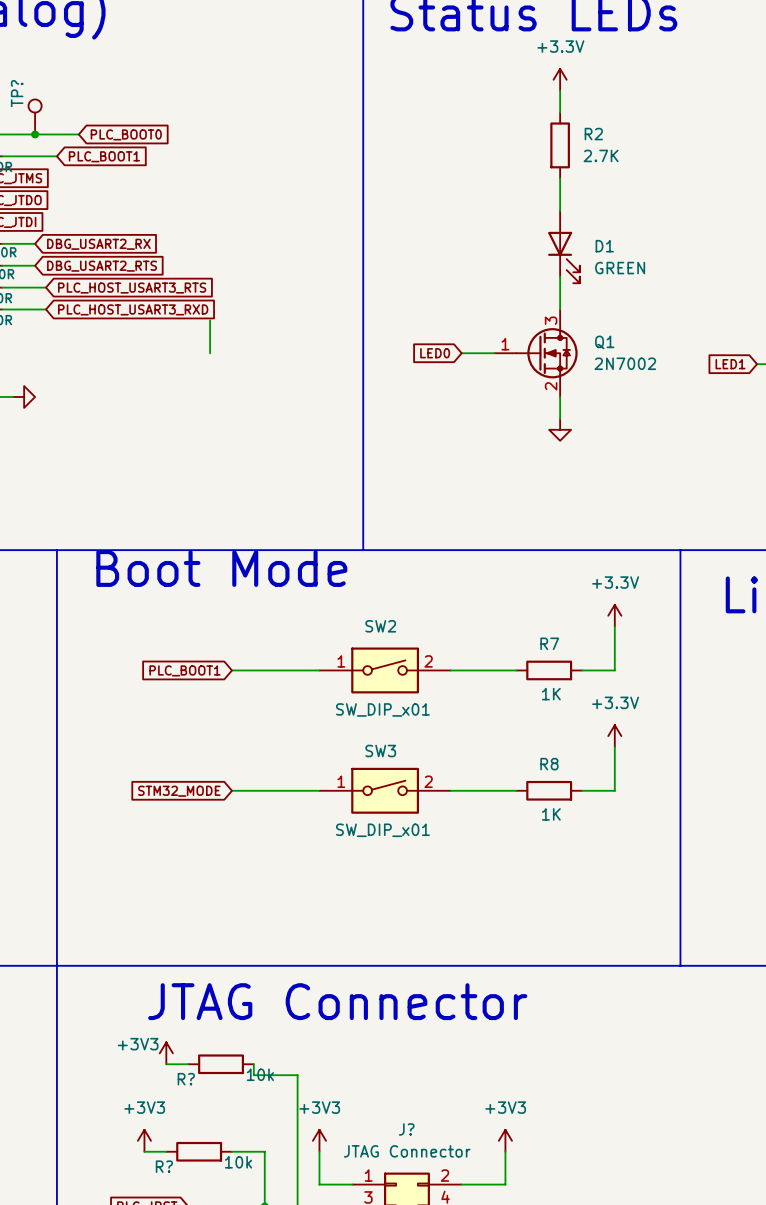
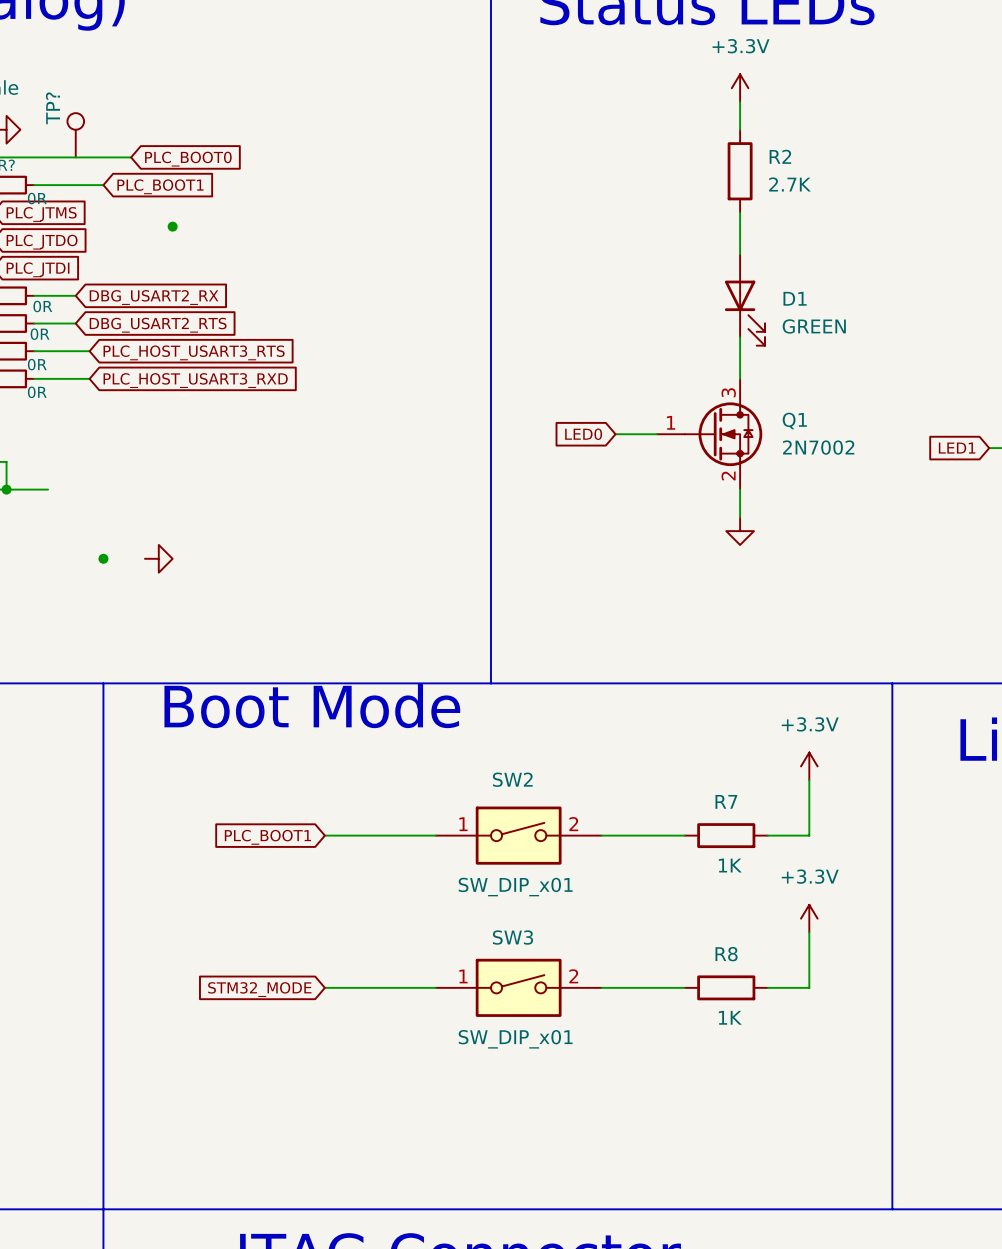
junction: (35, 134) -> none
junction: none -> (172, 226)
wire: (210, 320) (210, 353) -> none
power symbol position: (24, 396) -> (158, 558)
junction: none -> (103, 558)

